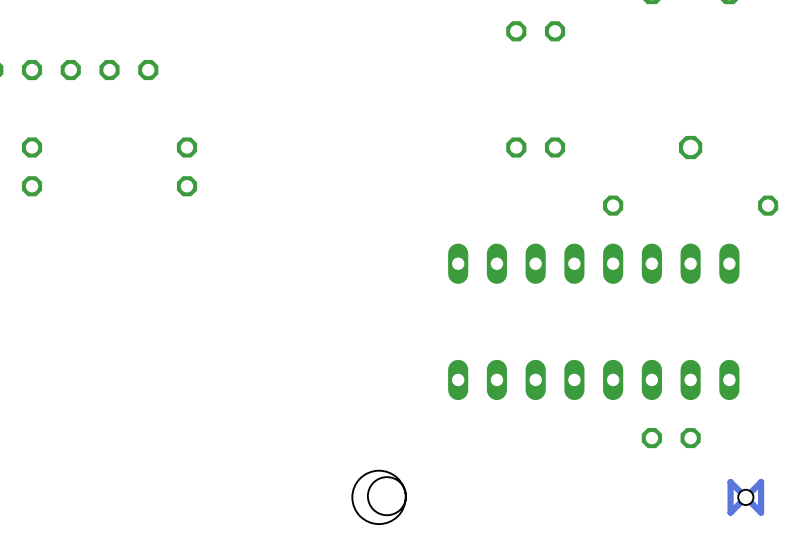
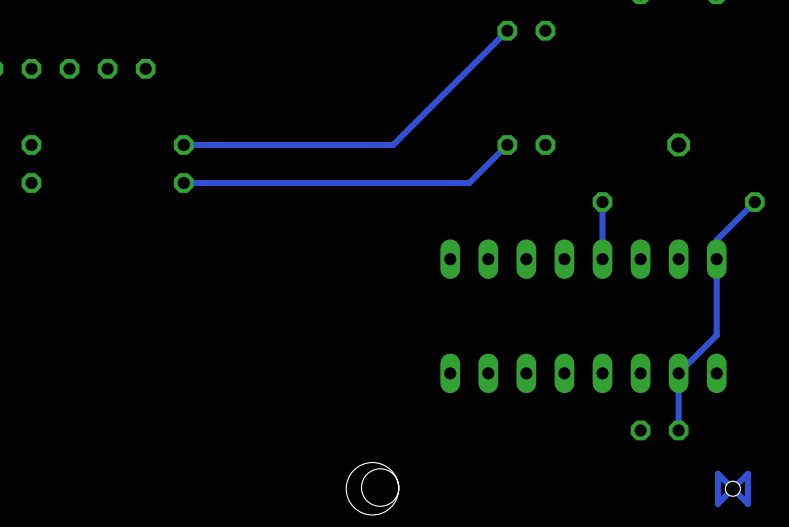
track: none -> (507, 30) (393, 144) (183, 144)
track: none -> (507, 144) (469, 183) (183, 183)
track: none -> (602, 202) (602, 259)
track: none -> (754, 202) (716, 240) (716, 335) (678, 373) (678, 430)

